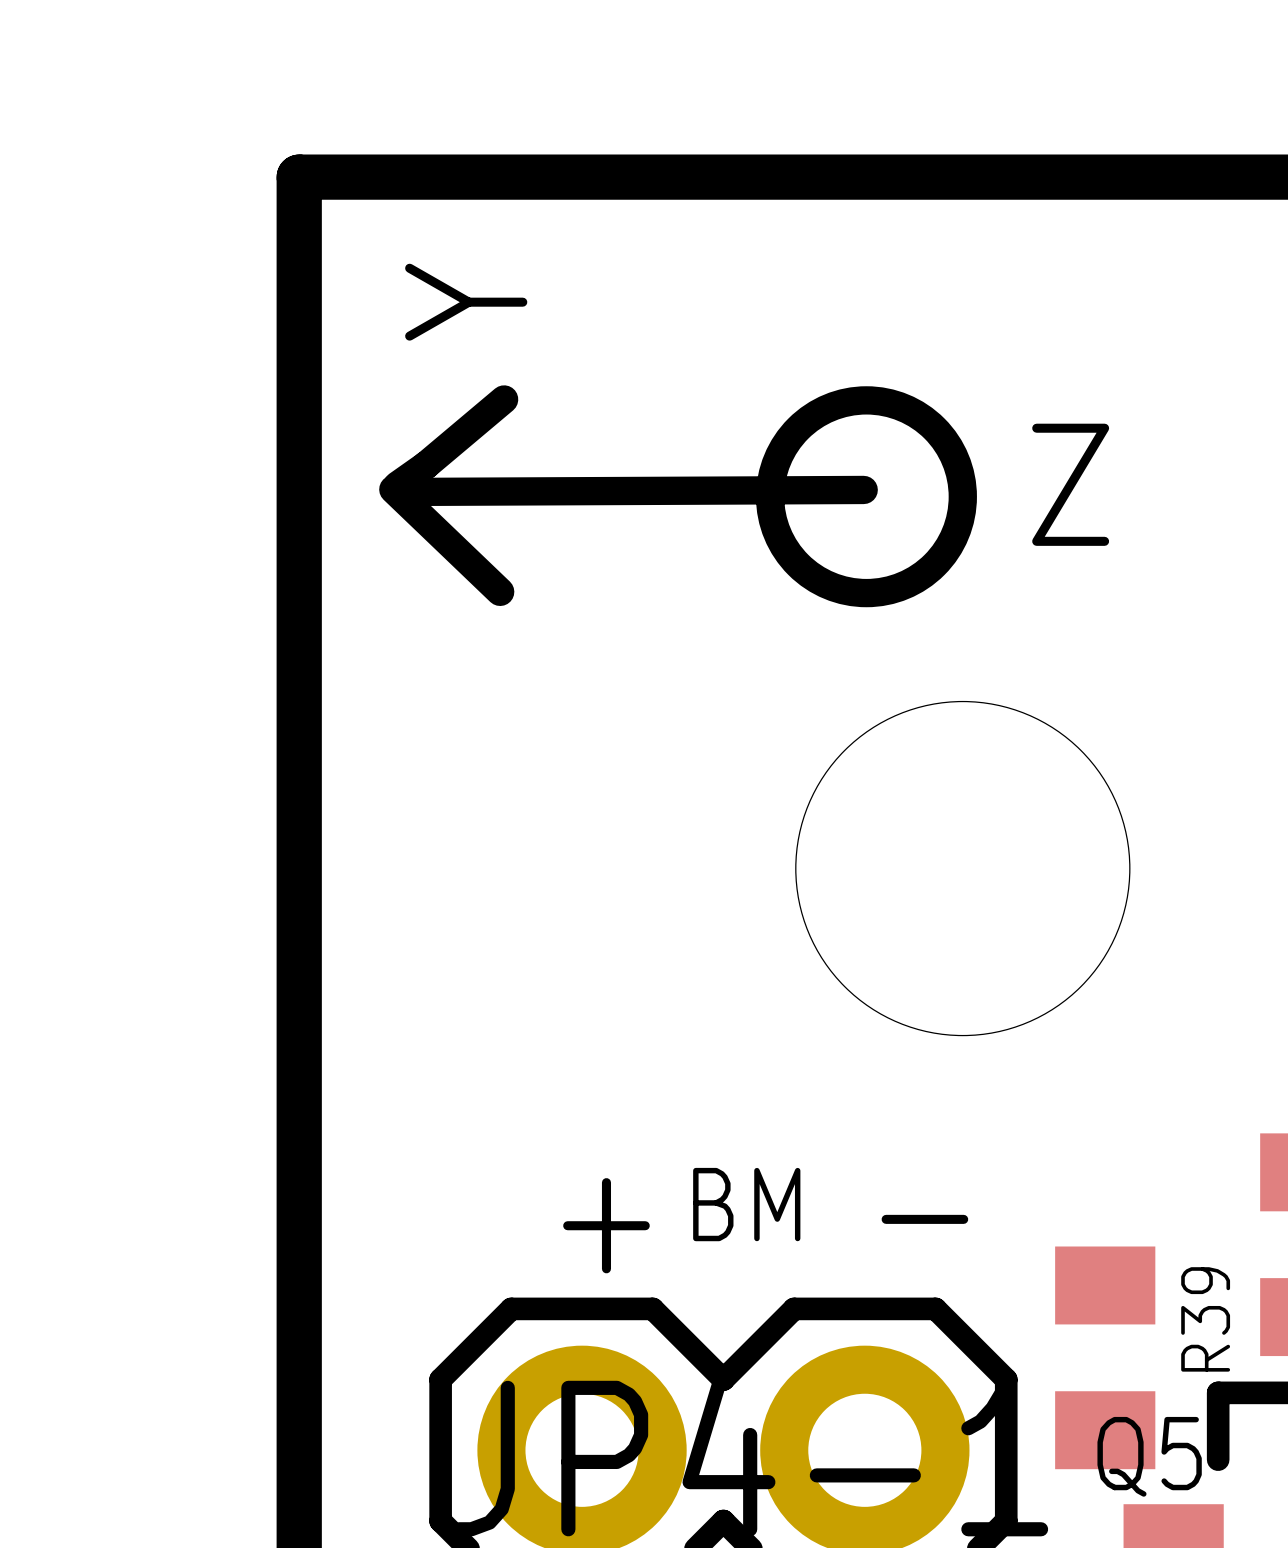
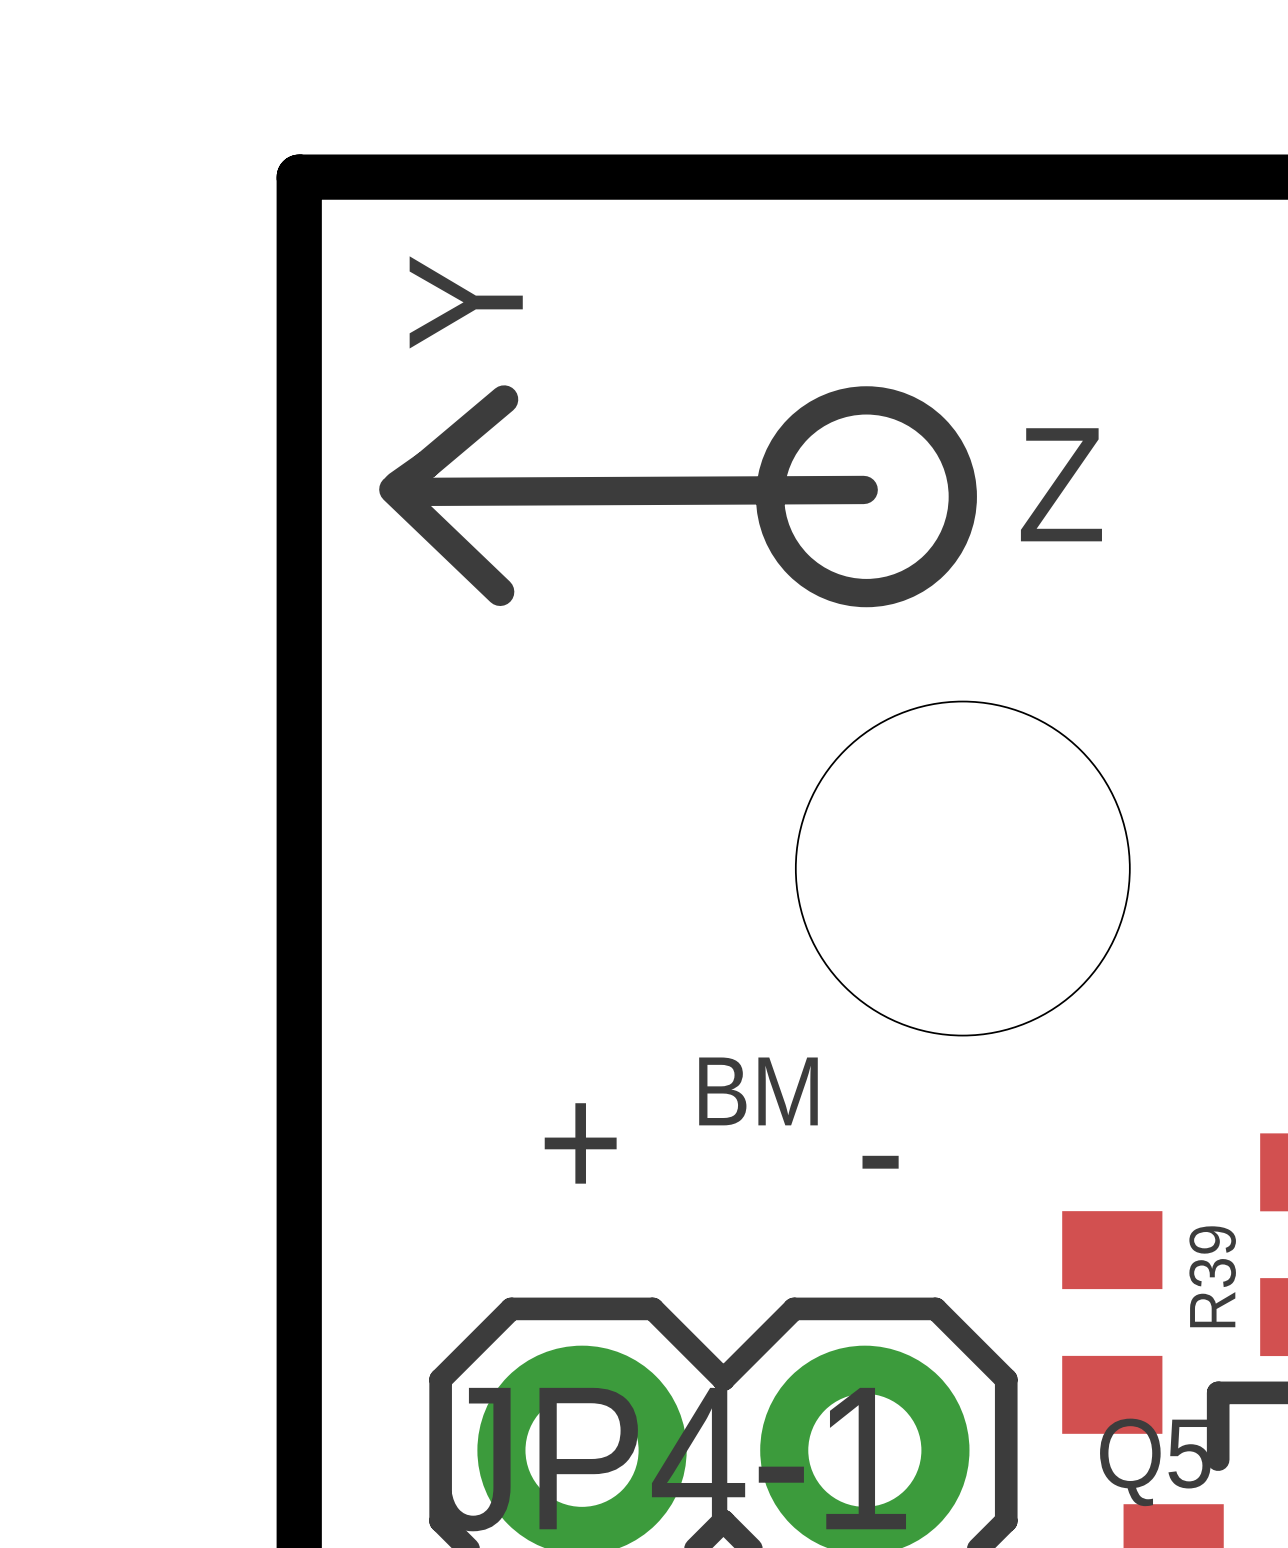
text position: BM (746, 1204) -> BM (758, 1091)
text position: - (924, 1219) -> - (880, 1162)
text position: + (606, 1225) -> + (580, 1143)
R39 position: (1105, 1357) -> (1112, 1322)

